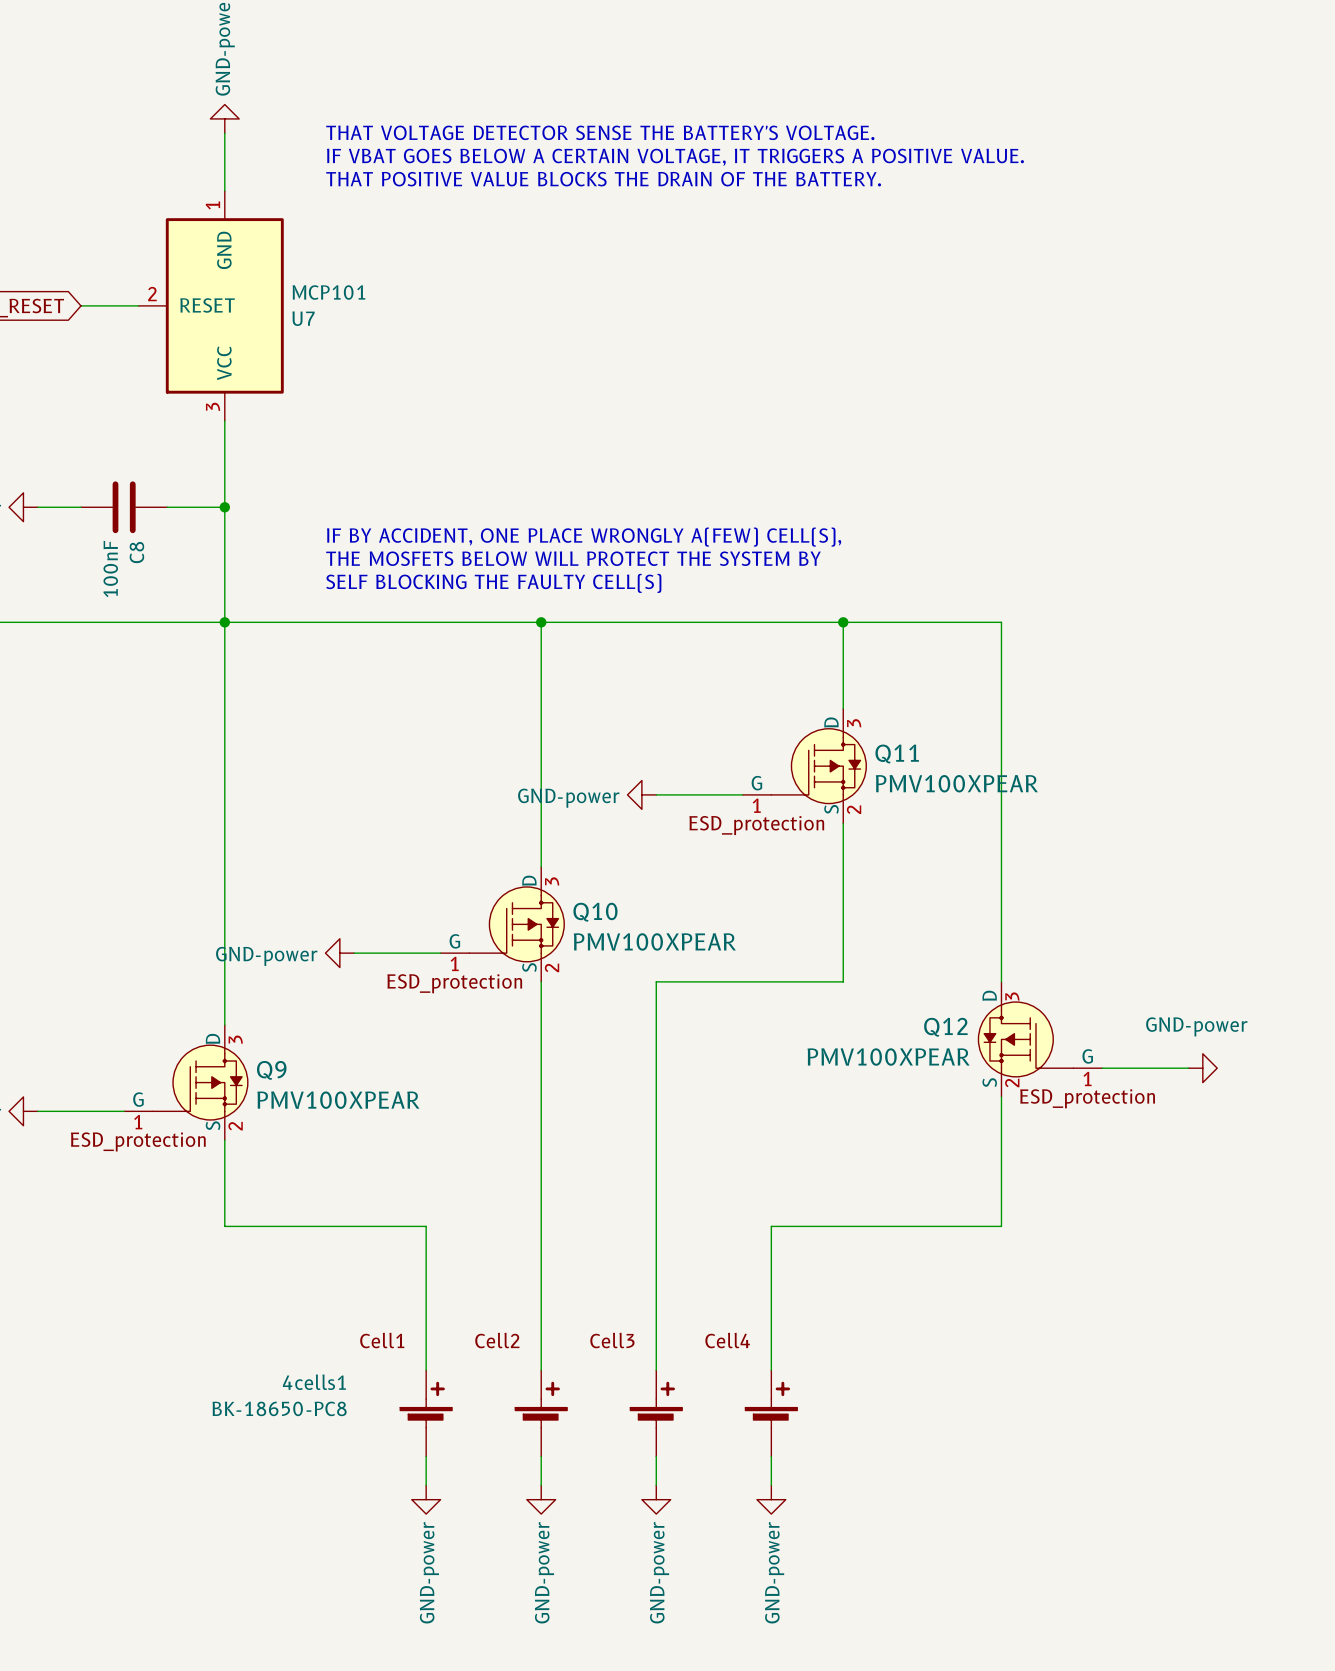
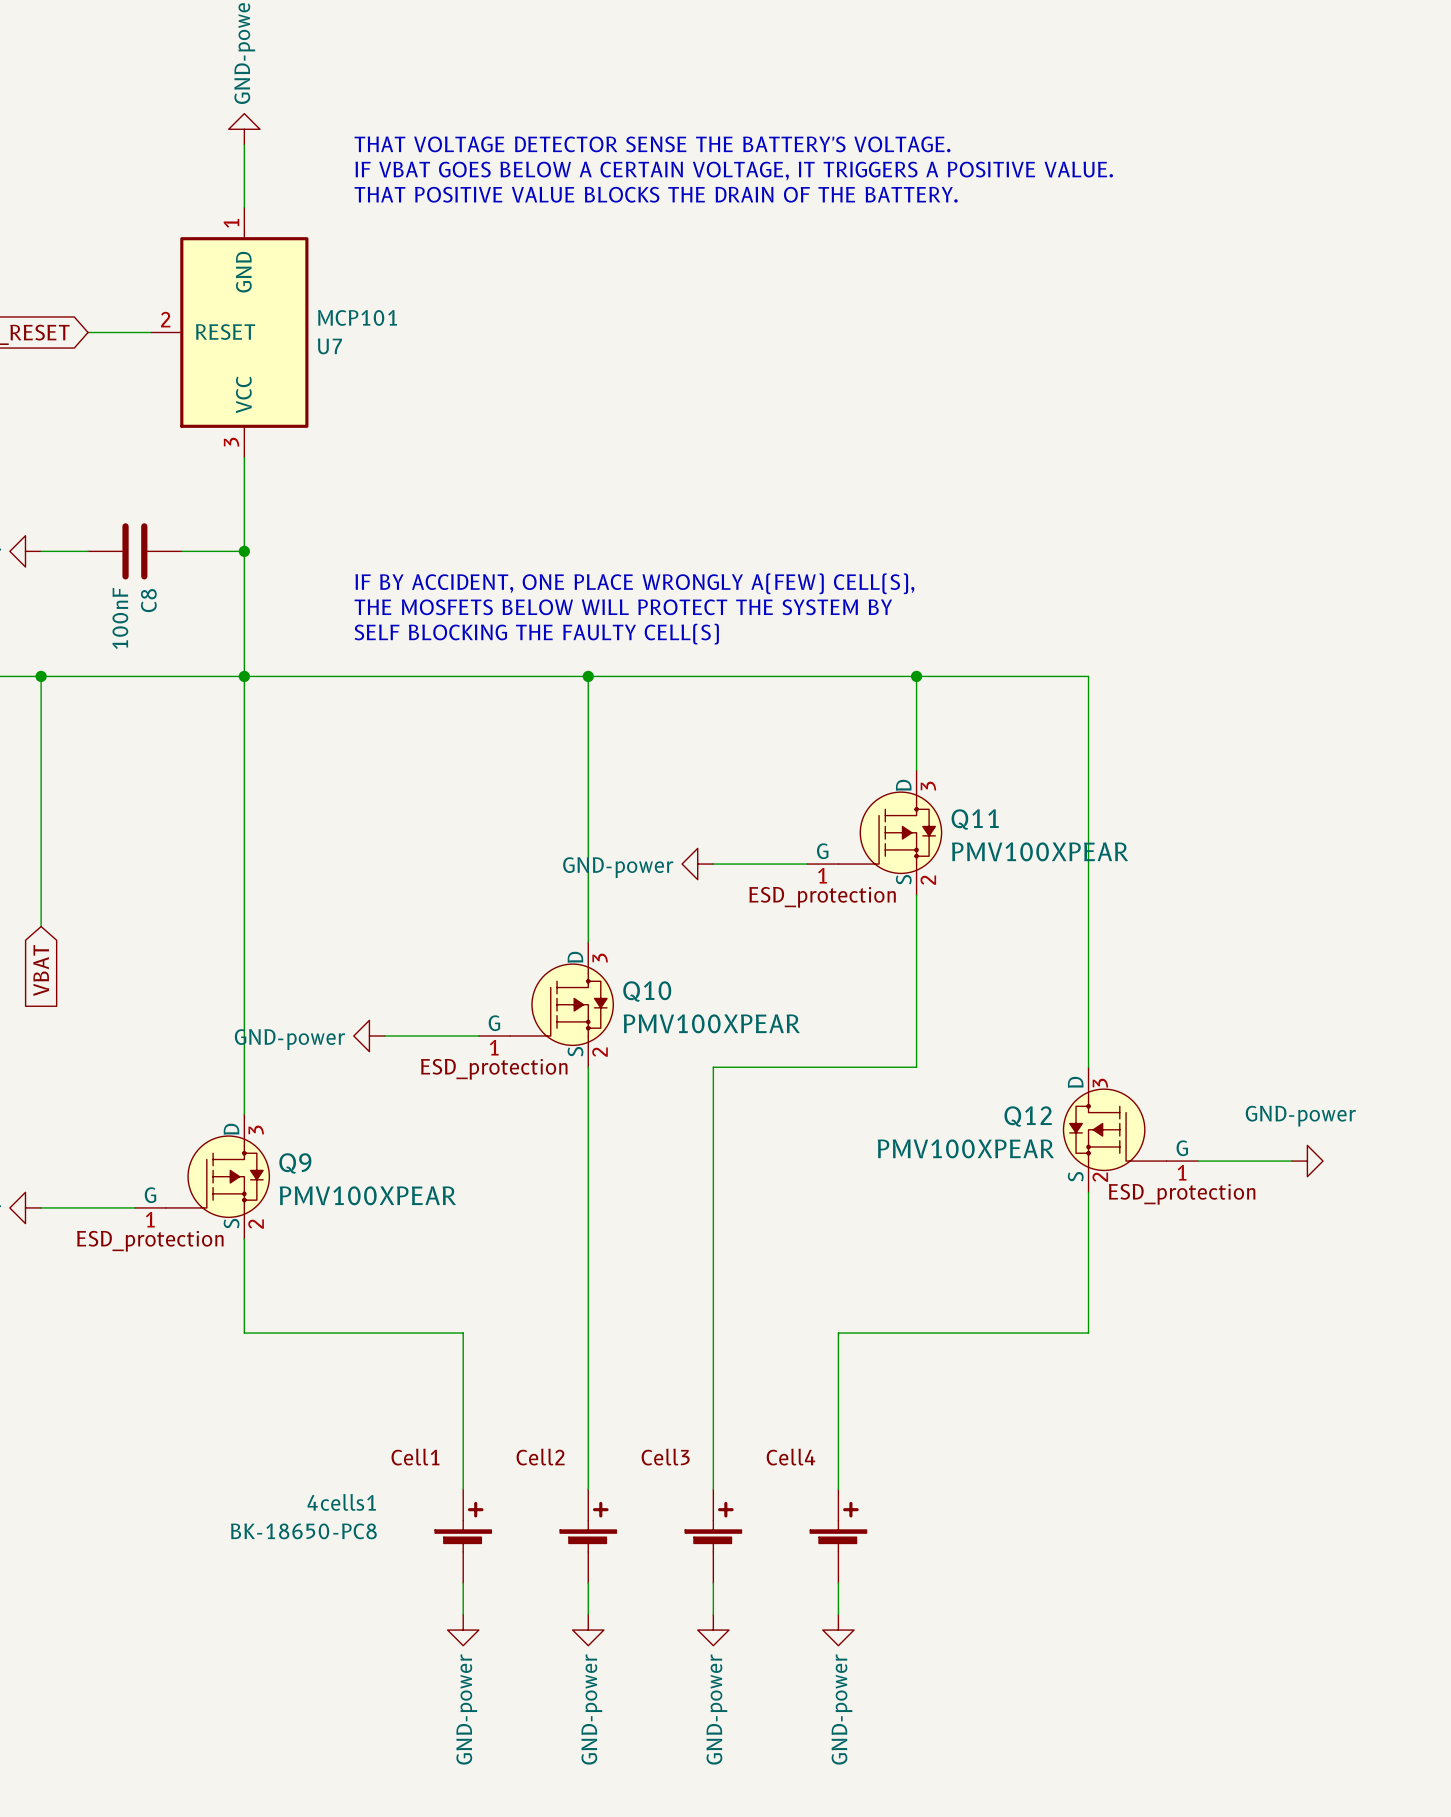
wire: none -> (41, 676) (41, 926)
junction: none -> (41, 676)
global label: none -> VBAT (41, 970)

